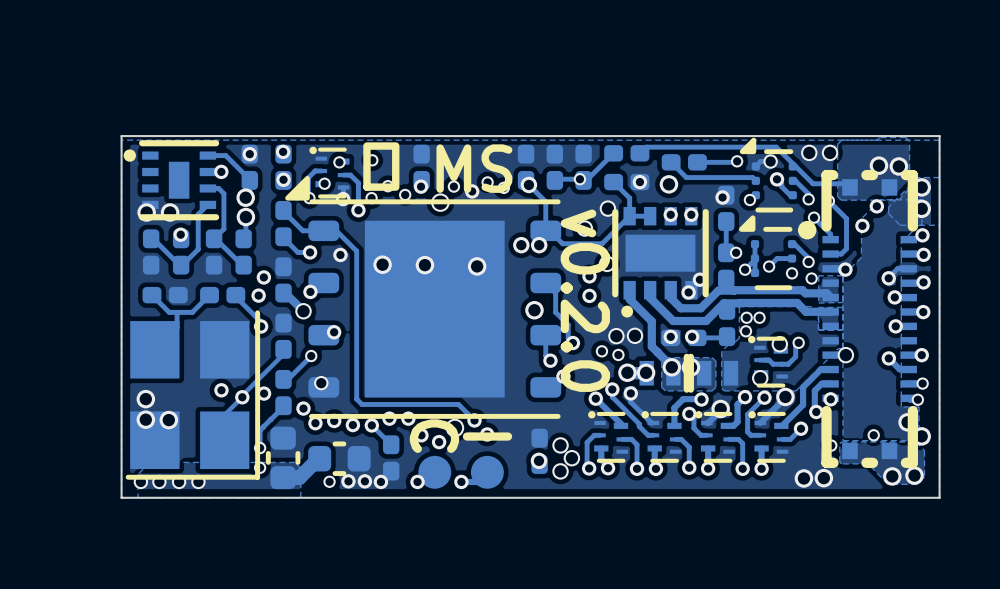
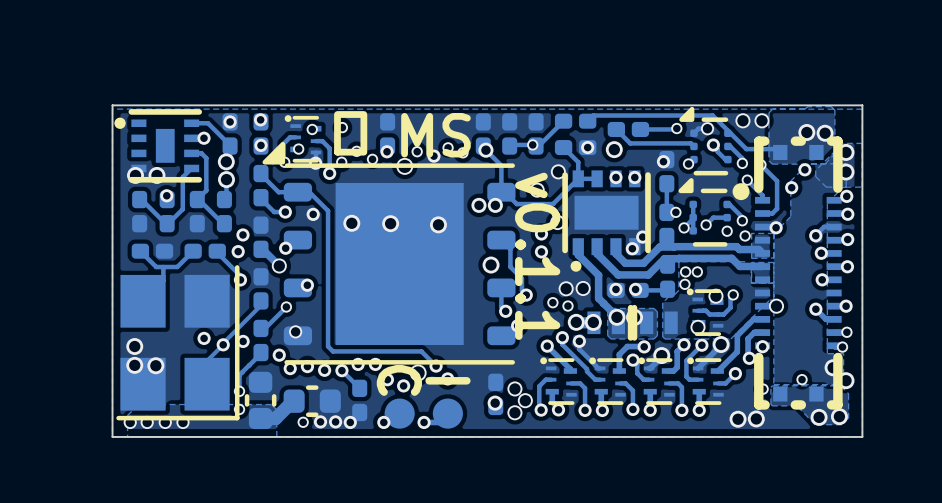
text: v0.2.0 (585, 300) -> v0.1.1 (537, 256)

